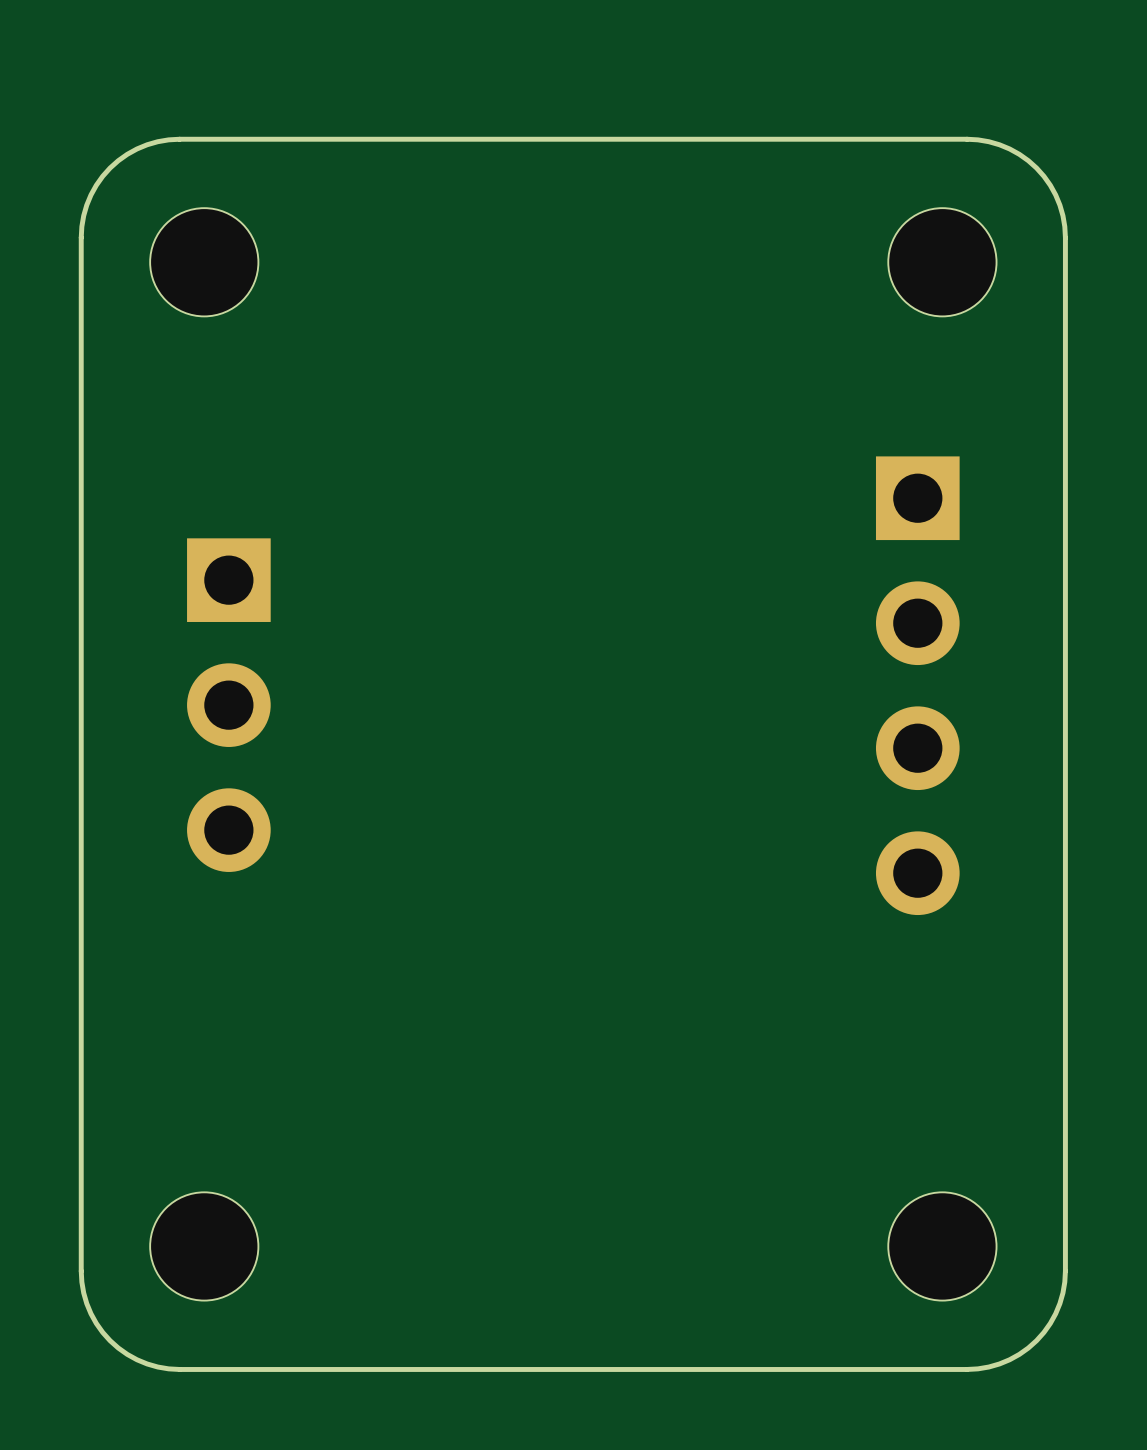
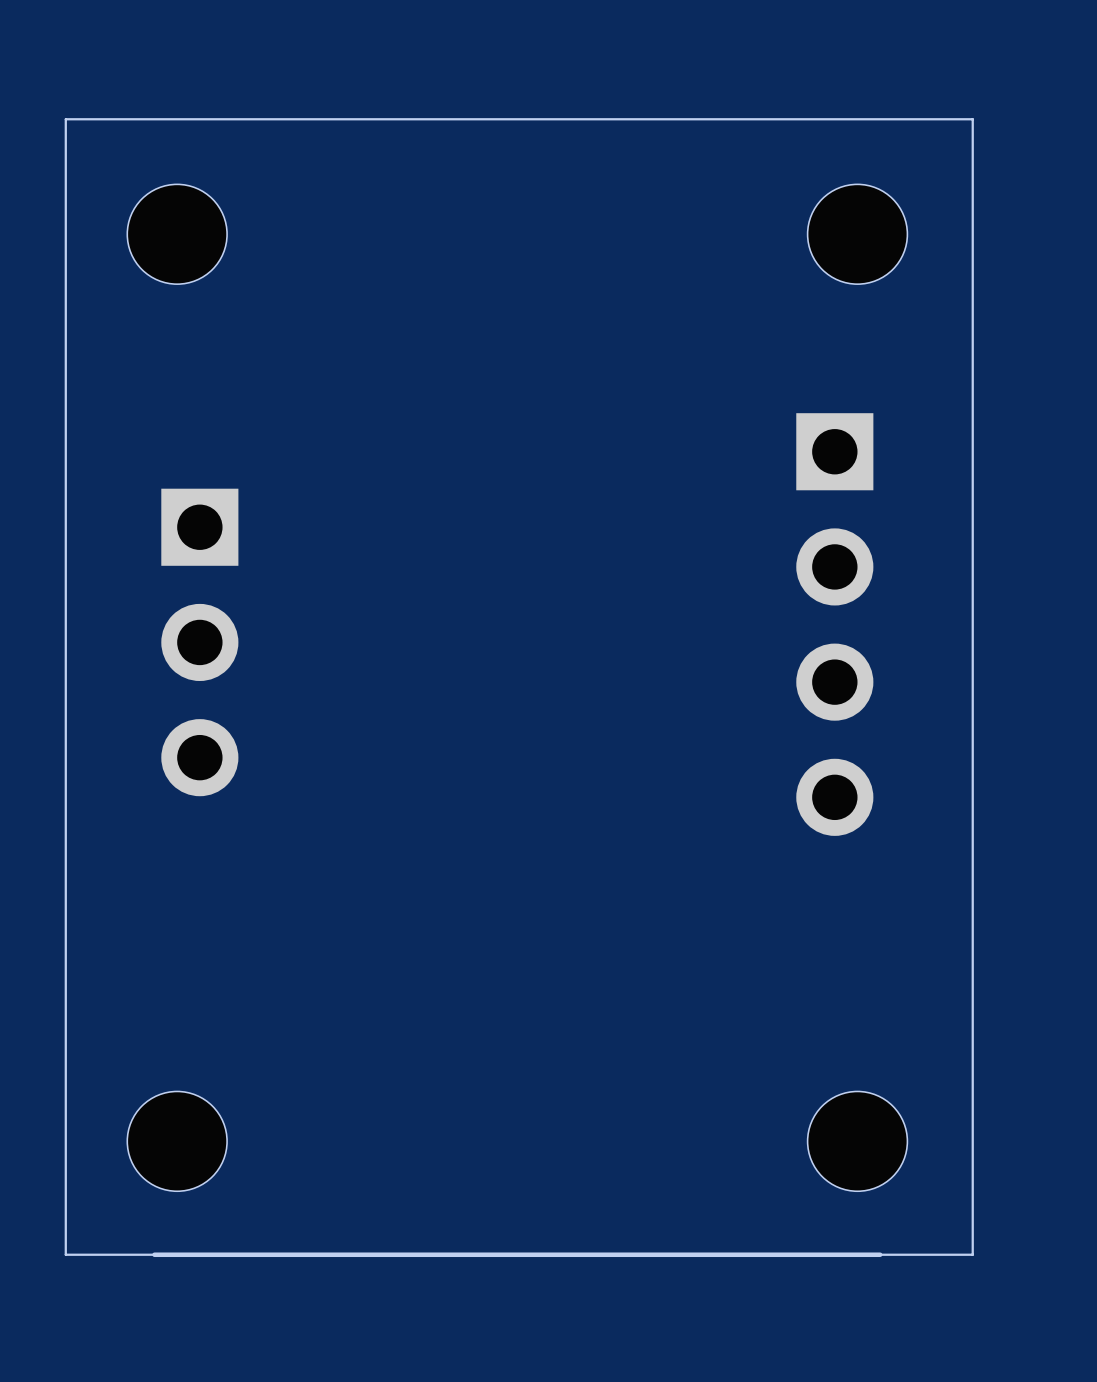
board edge: (967, 1369) (999, 1363) (1019, 1354) (1036, 1340) (1050, 1323) (1059, 1303) (1065, 1271) (1064, 226) (1055, 194) (1036, 168) (1009, 148) (988, 141) (967, 139) (179, 139) (157, 141) (136, 148) (118, 160) (96, 185) (83, 215) (81, 237) (81, 1282) (90, 1313) (110, 1340) (136, 1359) (157, 1367) (179, 1369) -> (880, 1254) (972, 1254) (972, 119) (65, 119) (65, 1254) (154, 1254)

